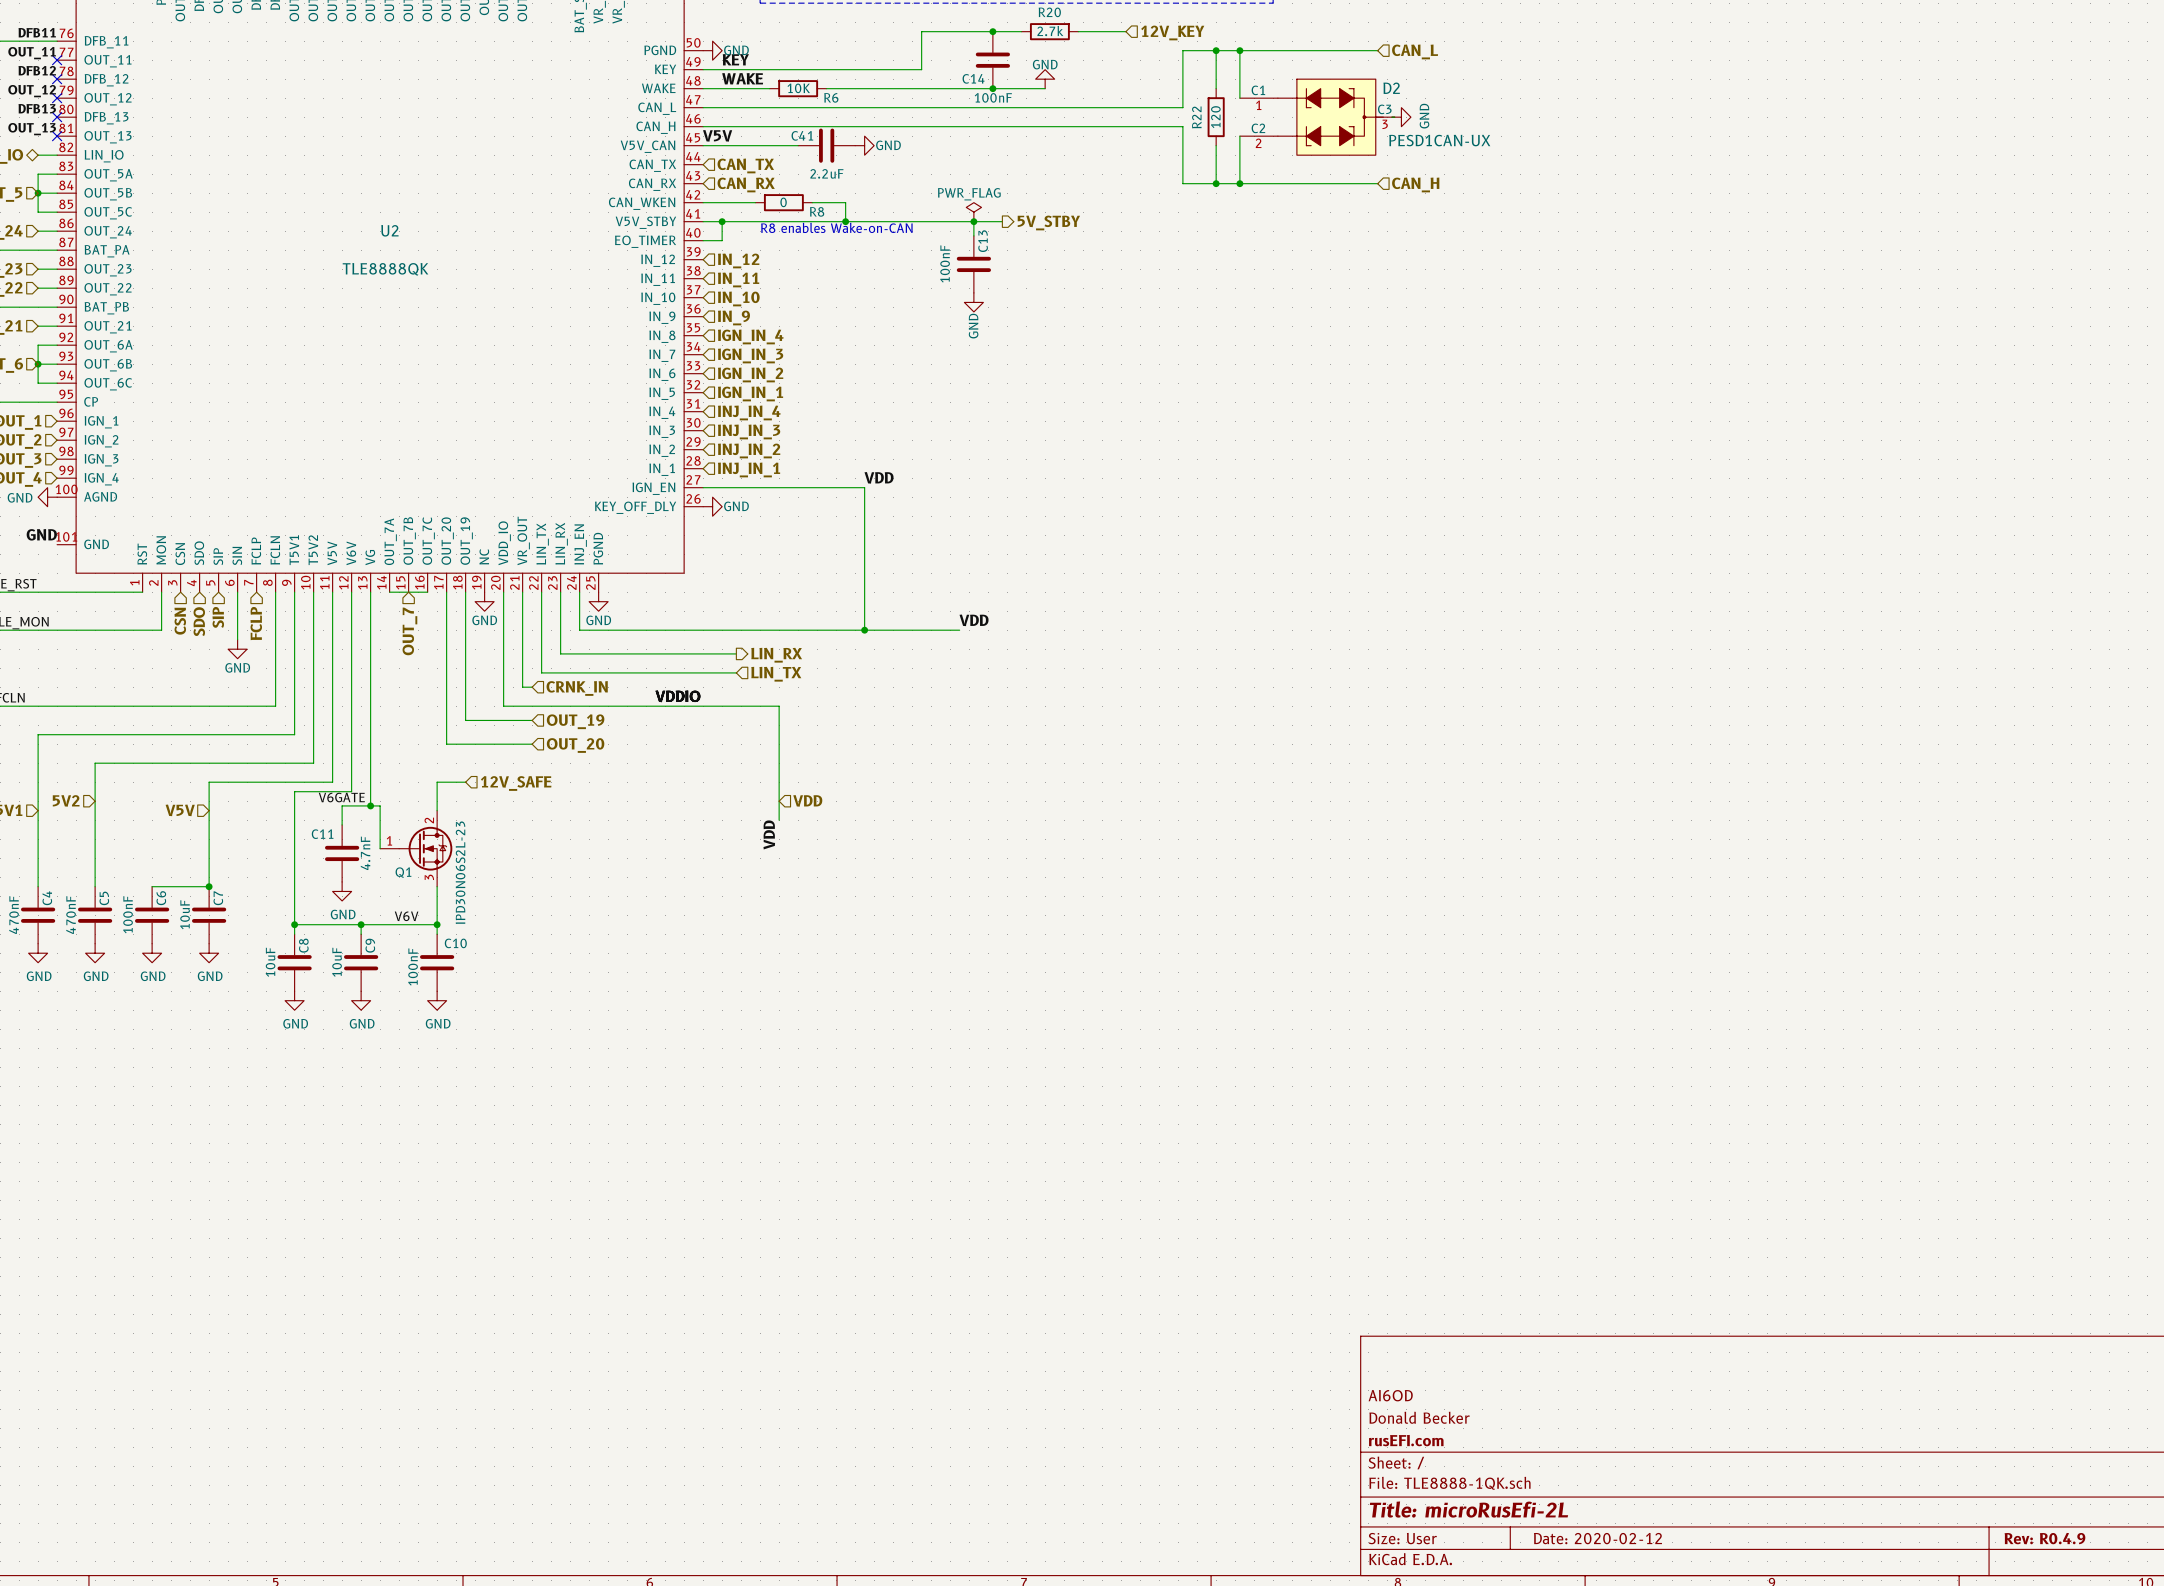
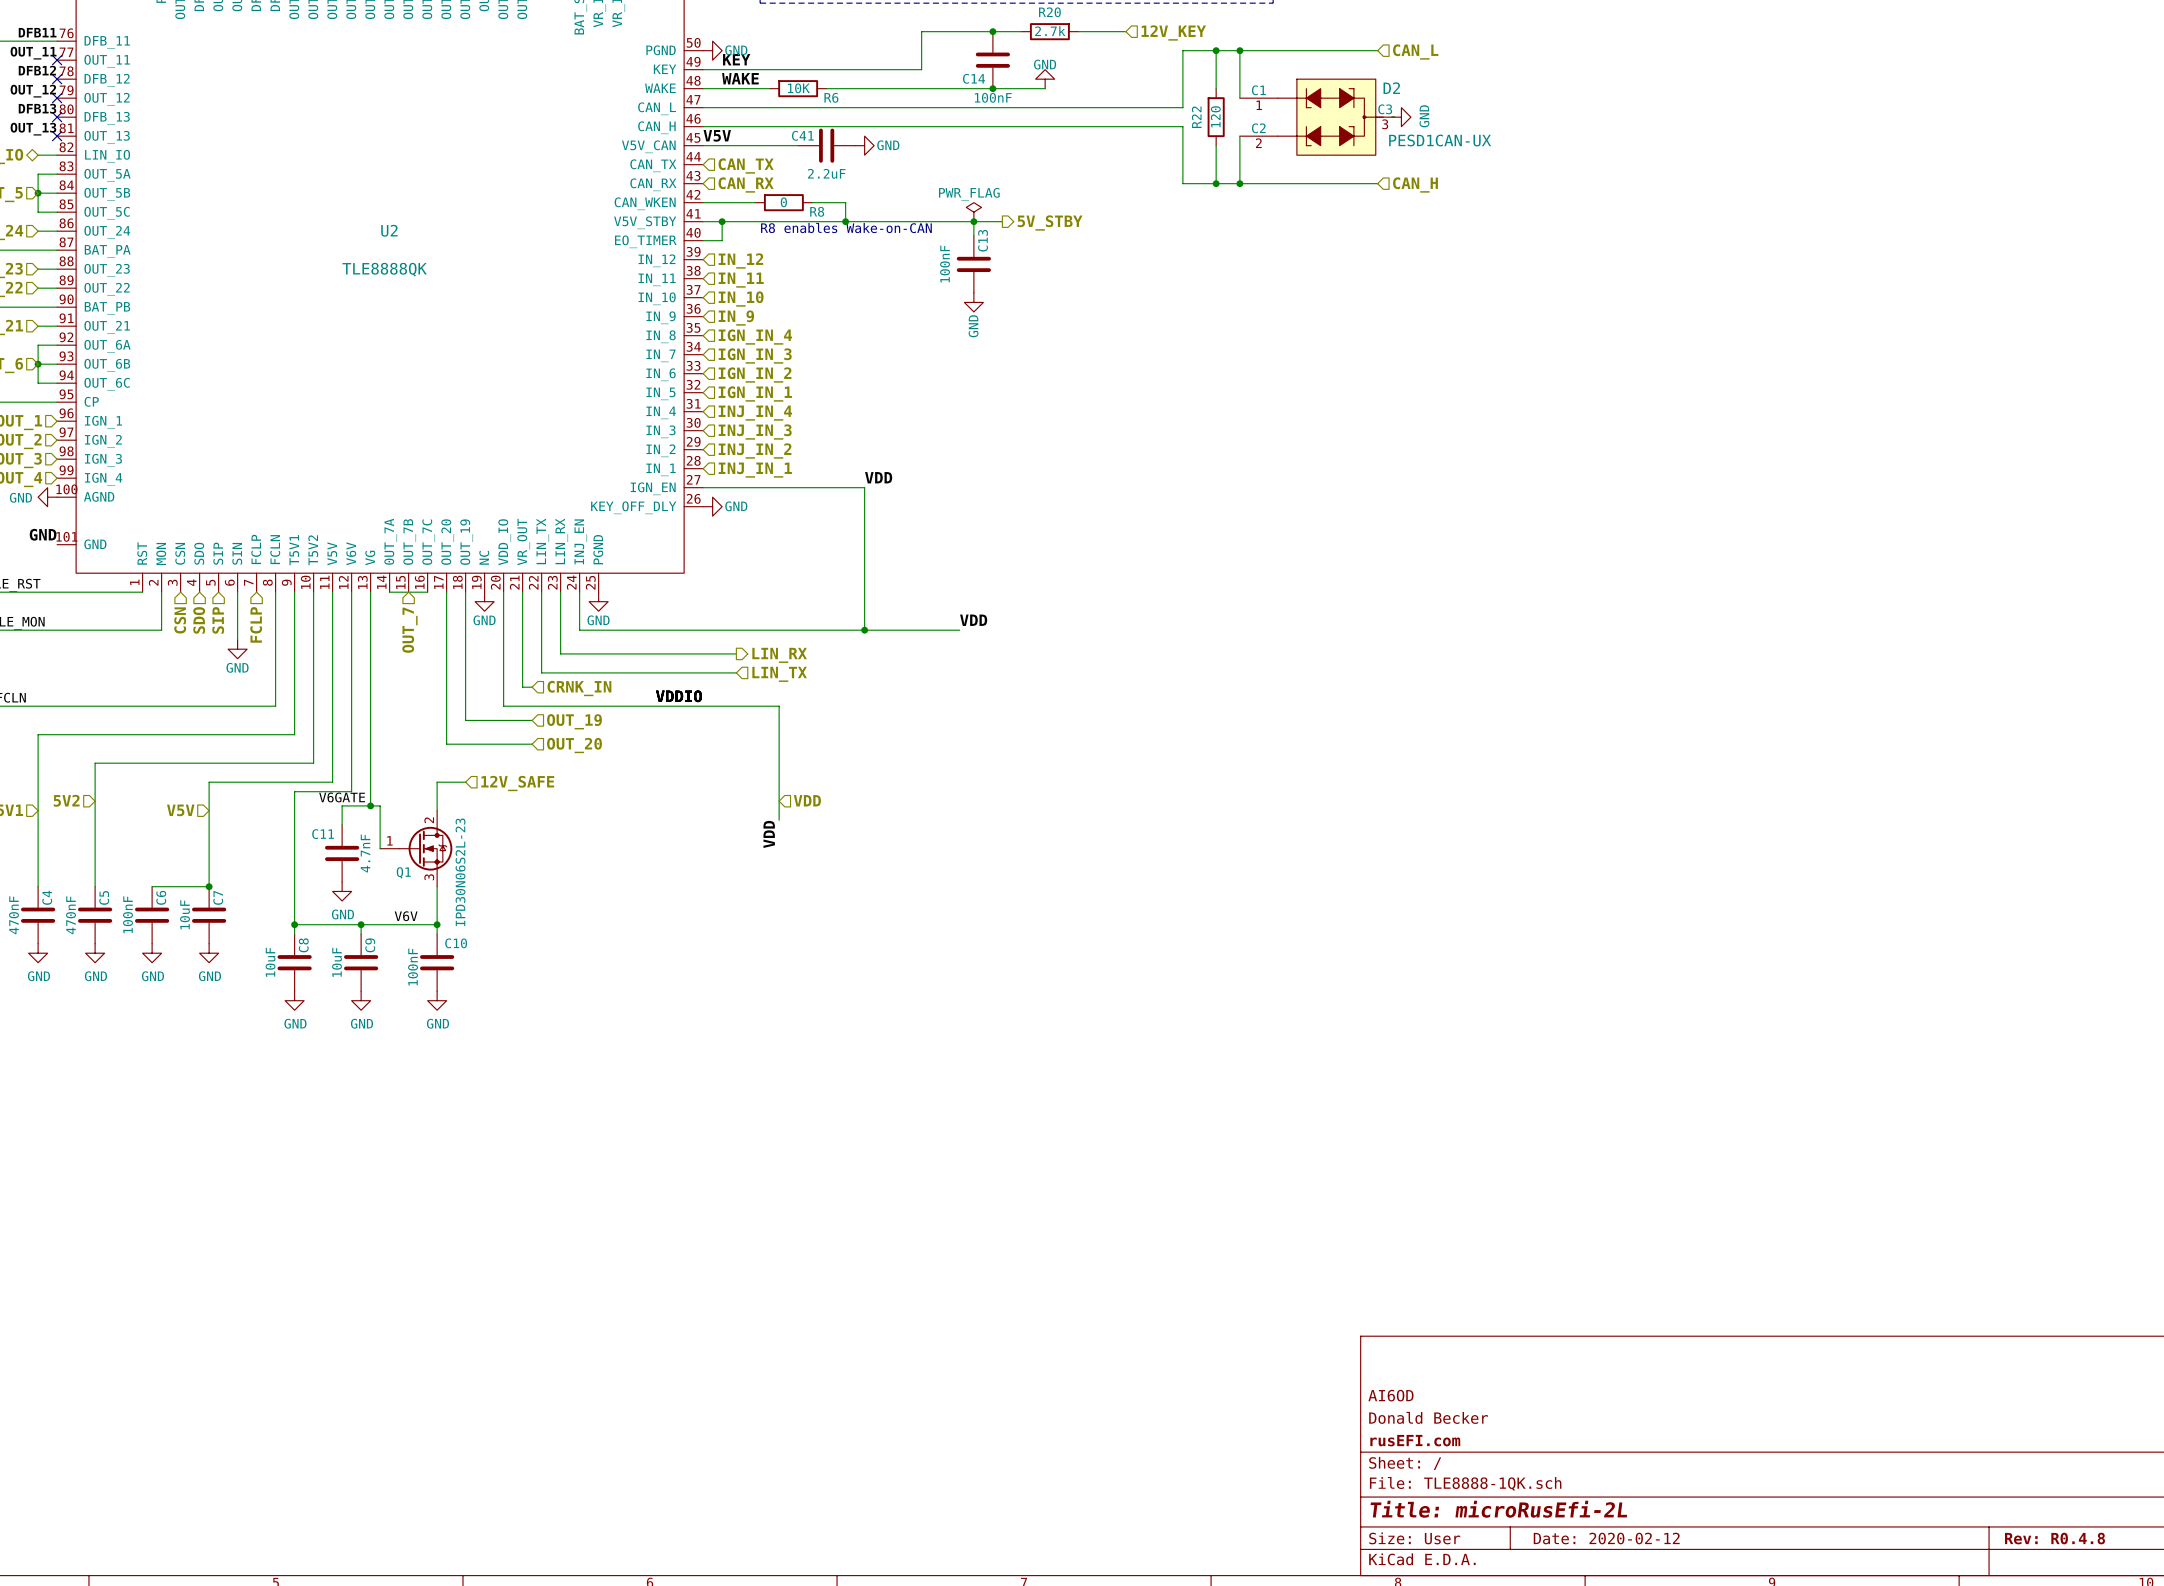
title block: Rev: R0.4.9 (2044, 1538) -> Rev: R0.4.8 (2054, 1538)

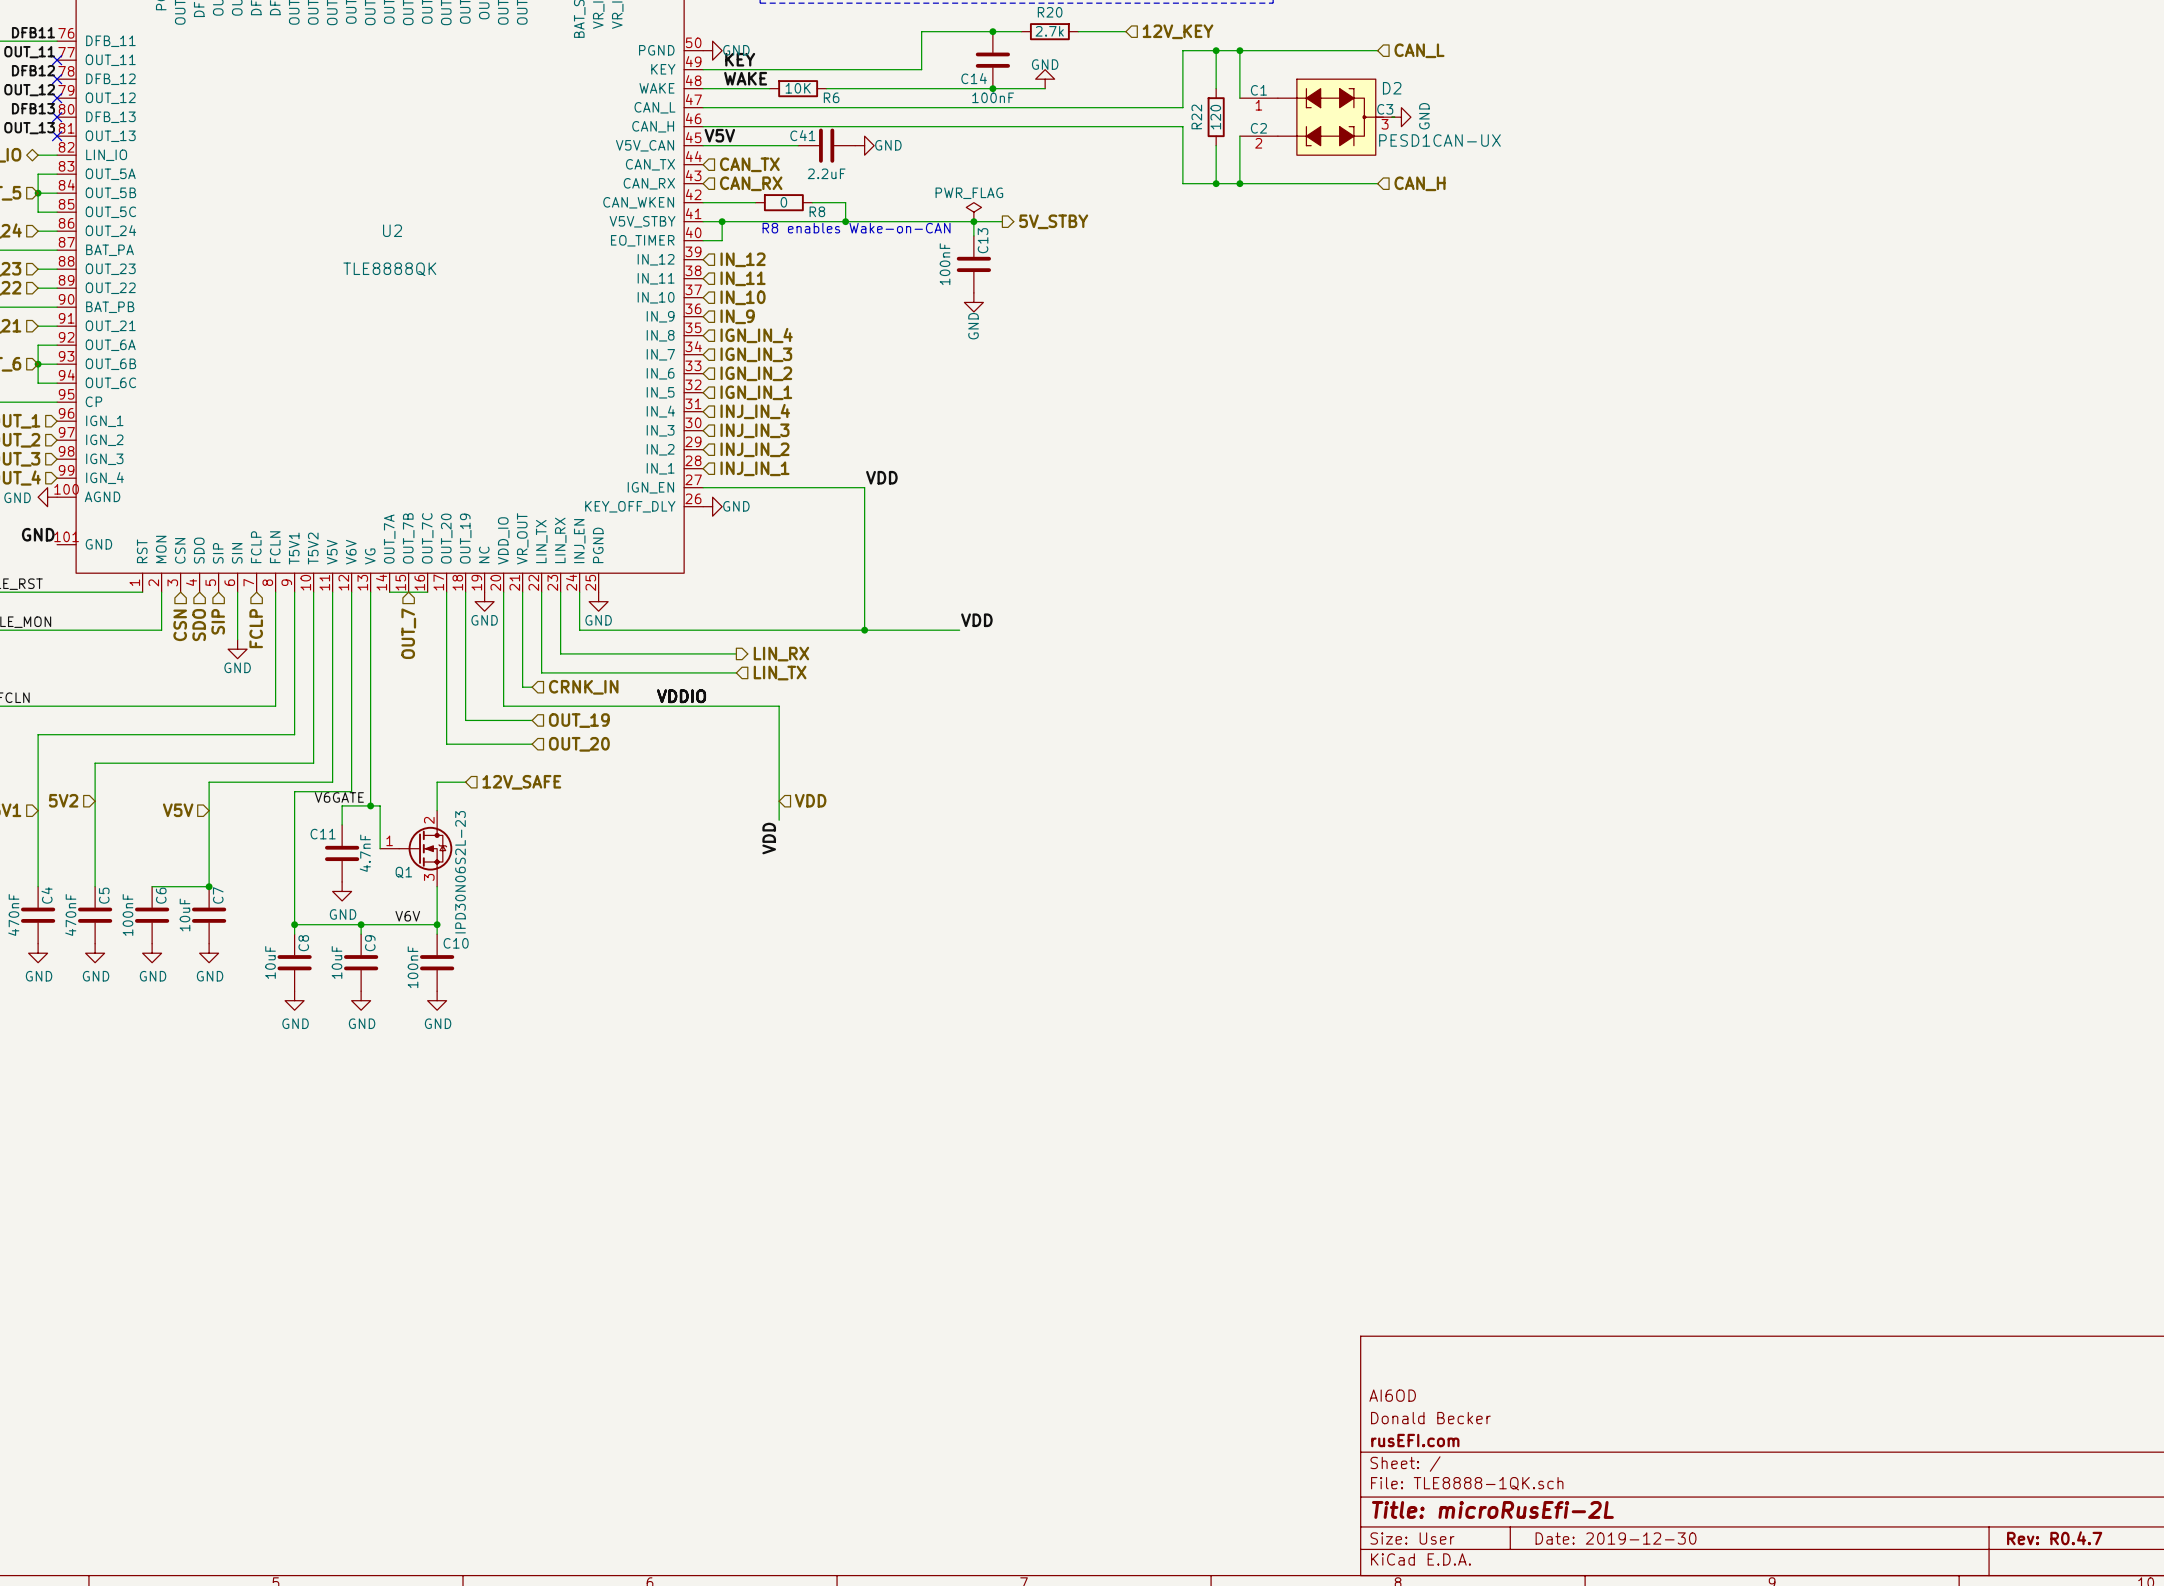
title block: Date: 2020-02-12 (1606, 1538) -> Date: 2019-12-30 (1616, 1538)
title block: Rev: R0.4.8 (2054, 1538) -> Rev: R0.4.7 (2054, 1538)

